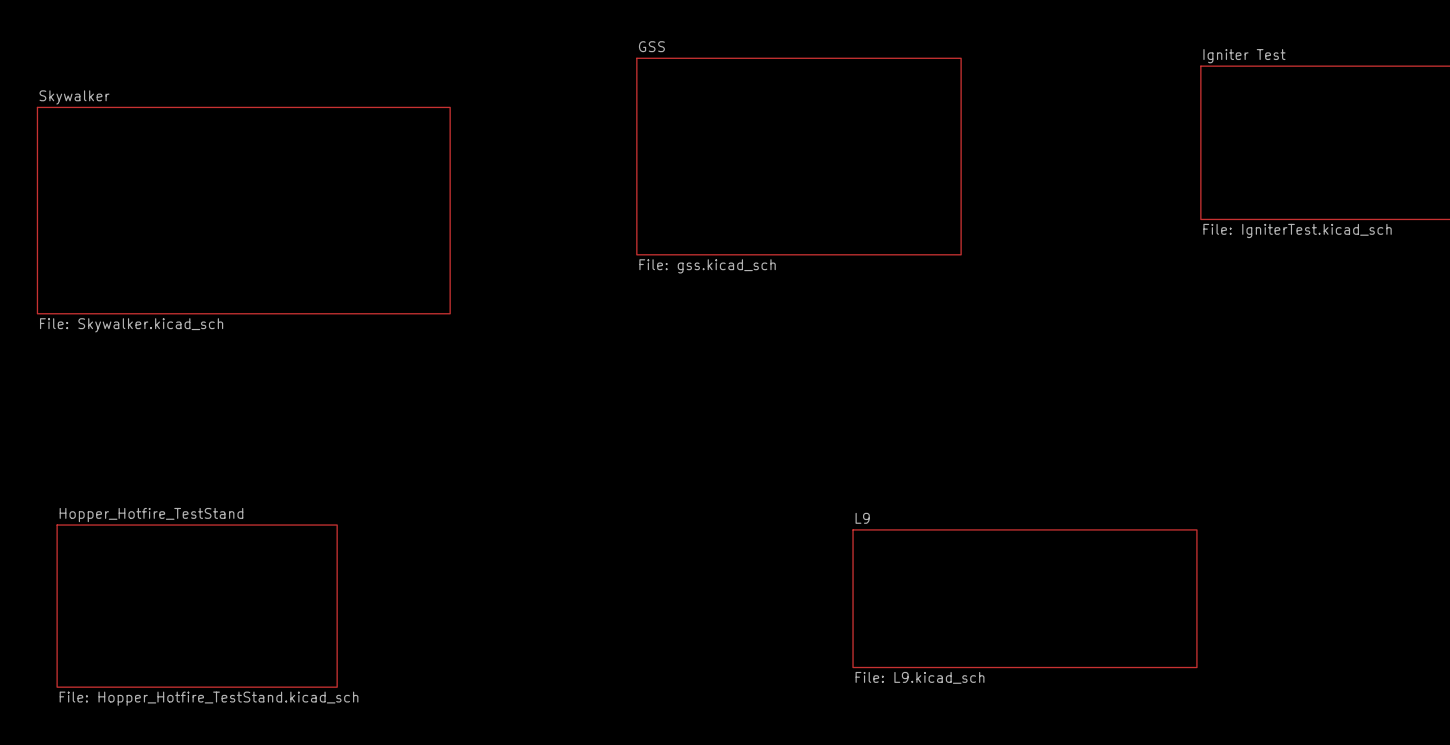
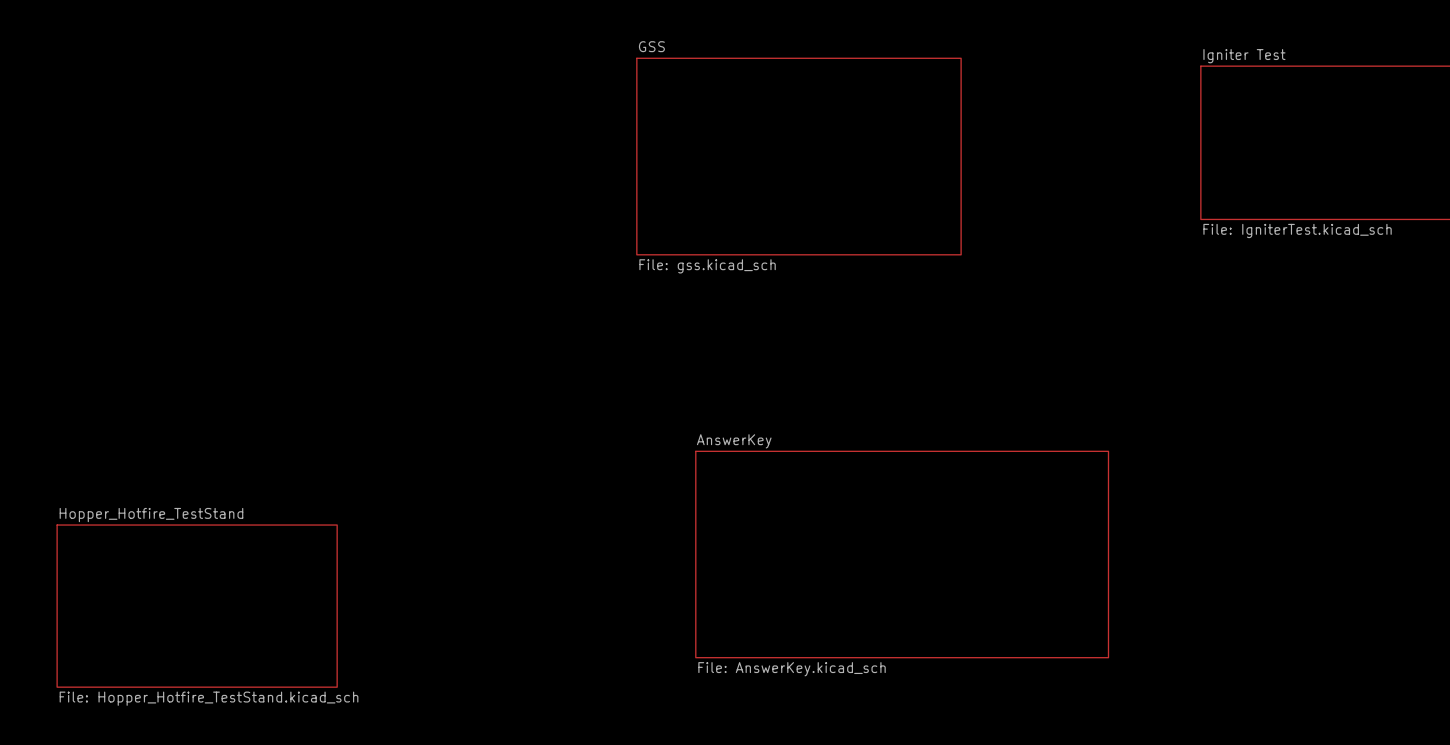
sheet Skywalker: File: Skywalker.kicad_sch (243, 210) -> none
sheet AnswerKey: none -> File: AnswerKey.kicad_sch (902, 554)
sheet L9: File: L9.kicad_sch (1024, 598) -> none

